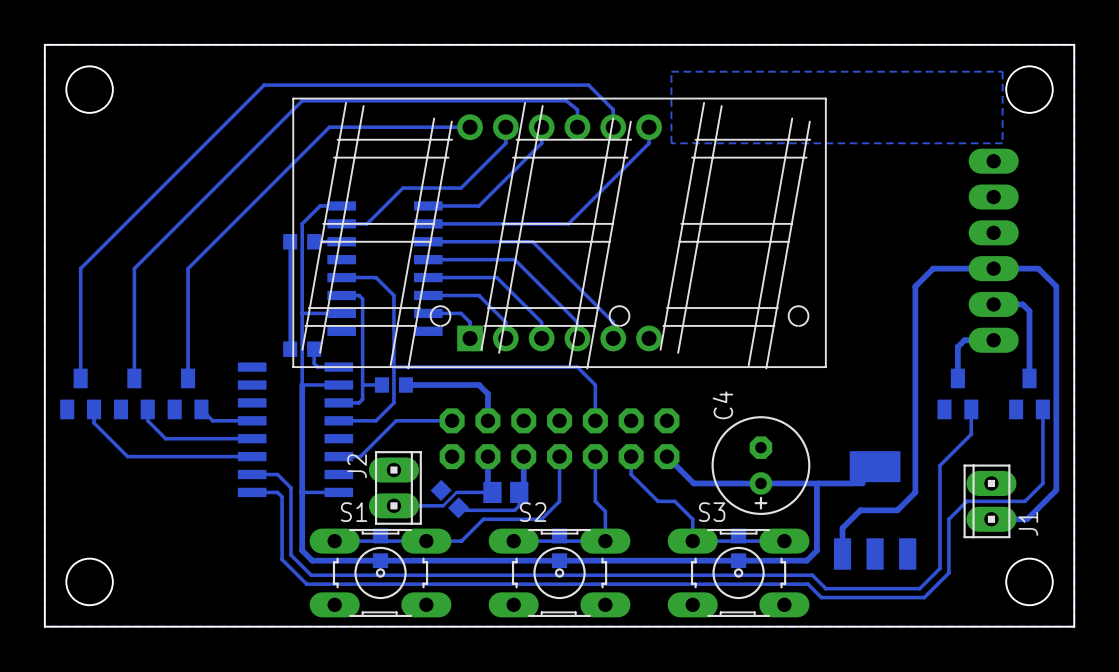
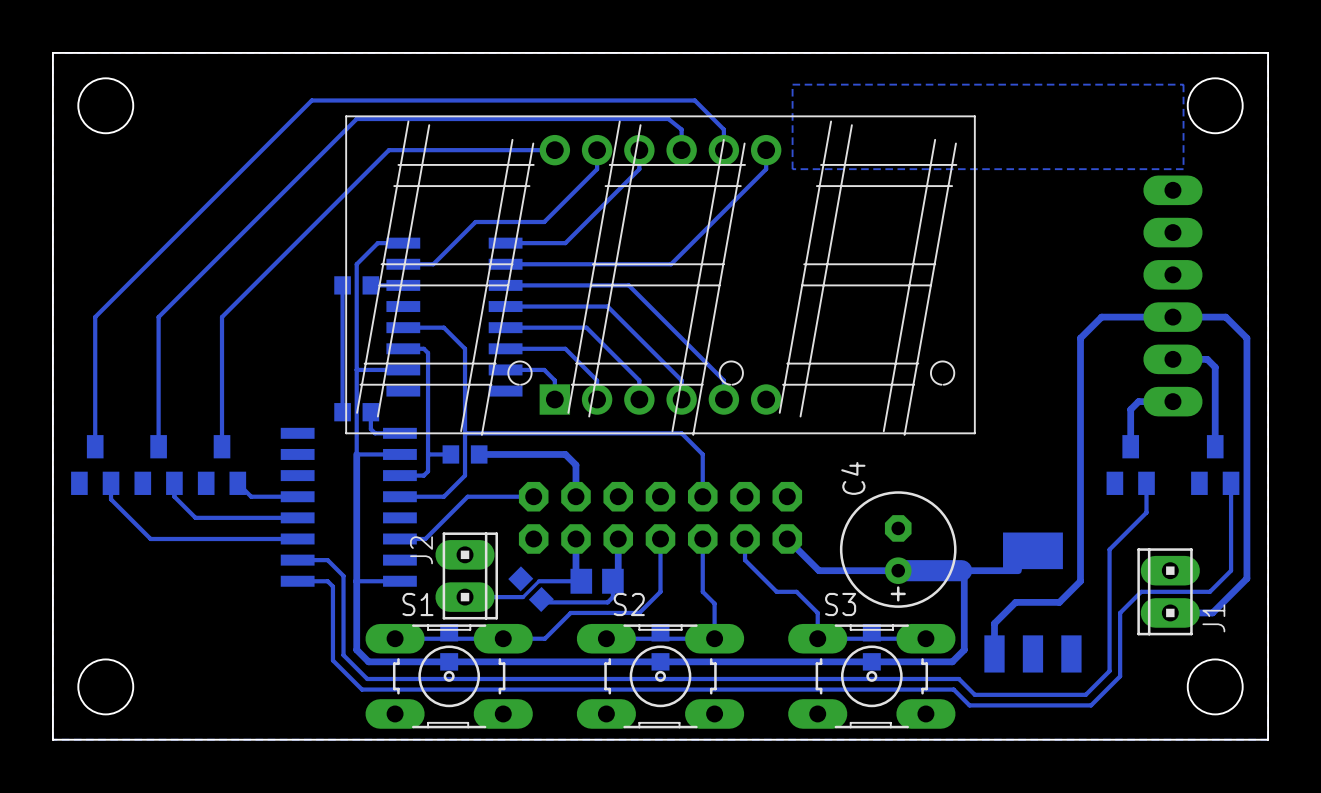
bottom track width: thin (760, 483) (814, 483) -> thick (898, 570) (961, 570)

